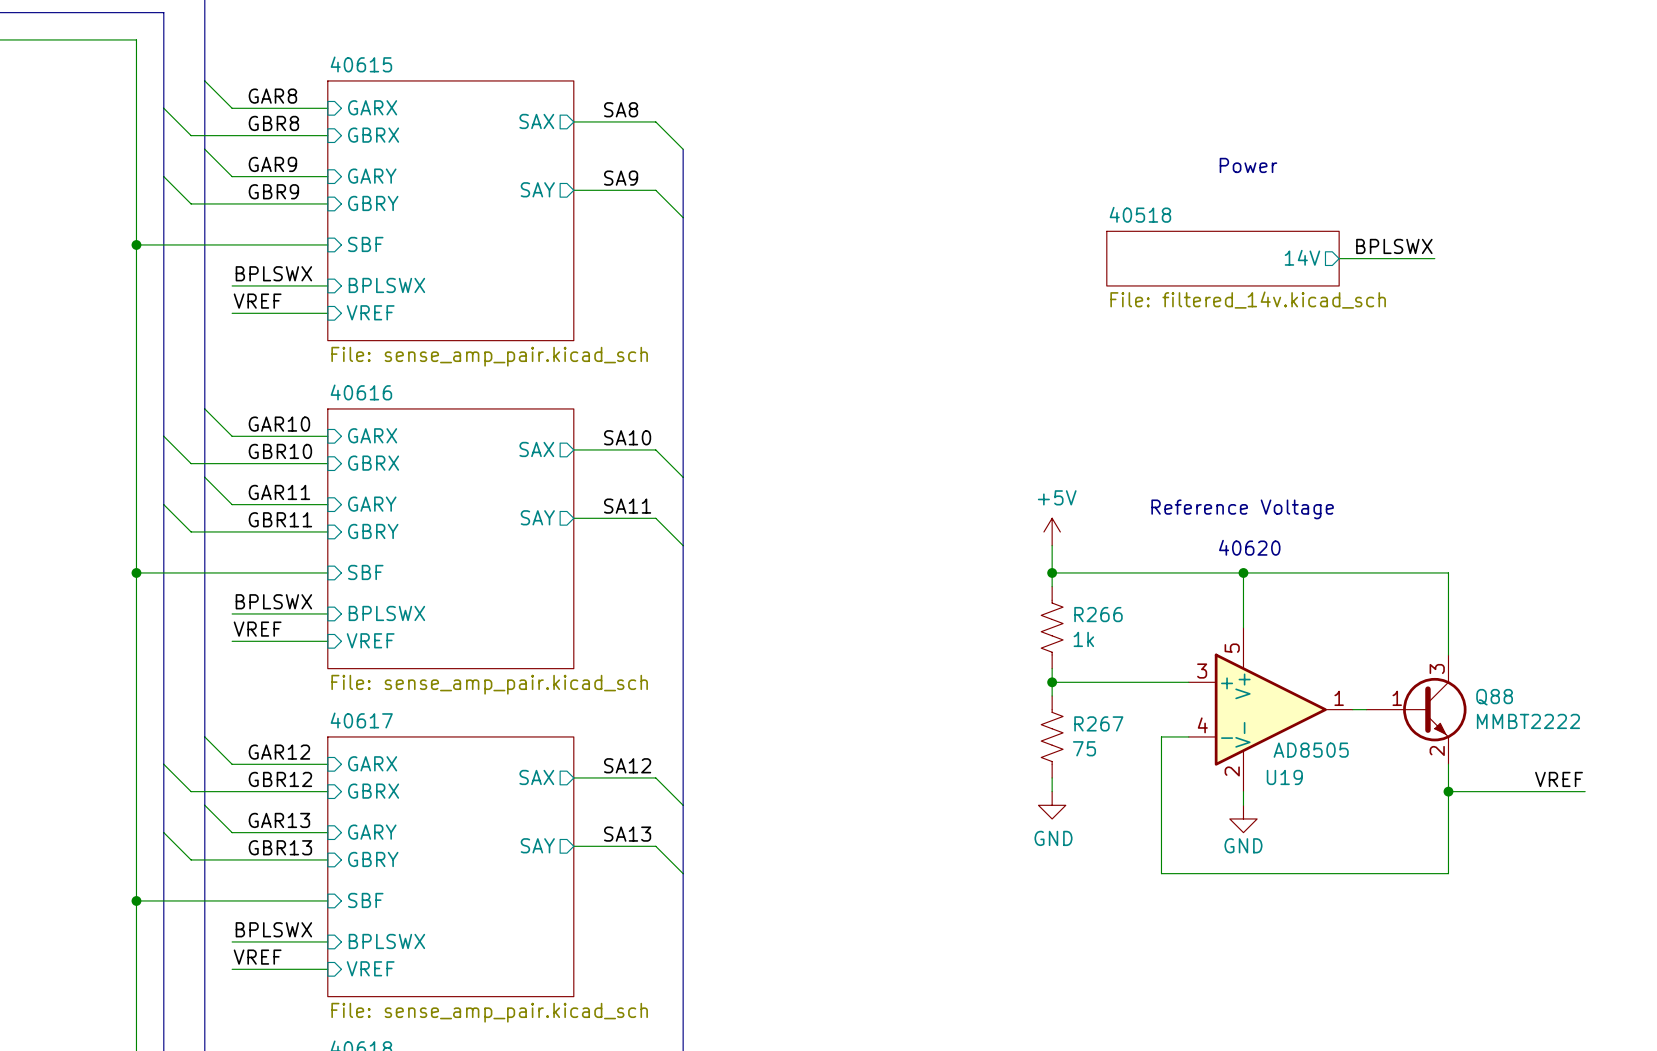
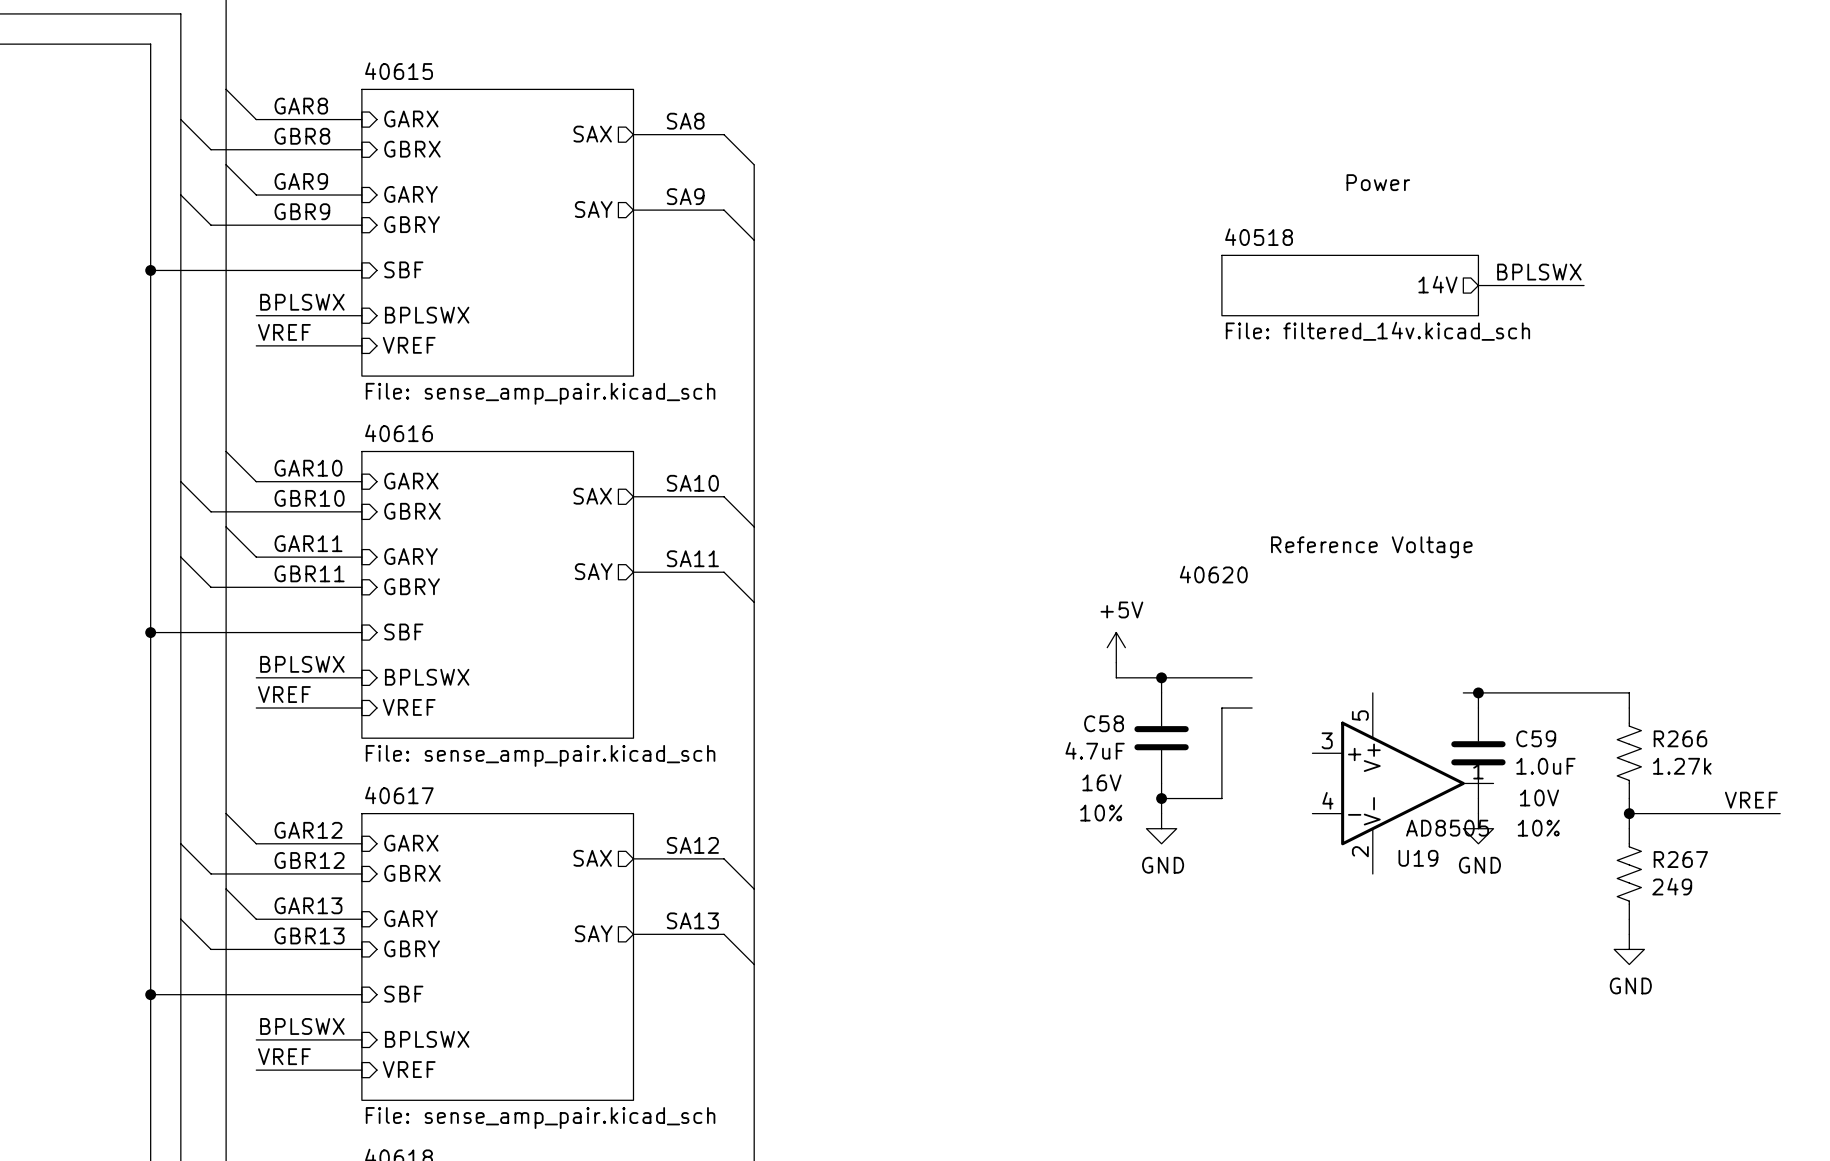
text position: Reference Voltage (1242, 509) -> Reference Voltage (1371, 547)
power symbol position: +5V (1052, 531) -> +5V (1116, 647)
wire: (1052, 545) (1052, 586) -> none
text position: 40620 (1249, 547) -> 40620 (1213, 574)
wire: (1052, 572) (1448, 572) (1448, 654) -> none
junction: (1052, 572) -> none
wire: (1243, 572) (1243, 627) -> none
junction: (1243, 572) -> none
wire: none -> (1116, 662) (1116, 677) (1252, 677)
junction: none -> (1161, 677)
R266 position: (1052, 627) -> (1629, 753)
wire: none -> (1463, 692) (1629, 692) (1629, 708)
wire: none -> (1478, 692) (1478, 708)
junction: none -> (1478, 692)
R266 value: 1k (1083, 639) -> 1.27k (1682, 766)
wire: none -> (1252, 708) (1221, 708) (1221, 798) (1161, 798)
C58: none -> 4.7uF (1161, 738)
wire: (1052, 682) (1188, 682) -> none
junction: (1052, 682) -> none
C59: none -> 1.0uF (1478, 753)
wire: (1352, 709) (1366, 709) -> none
Q88: MMBT2222 (1416, 709) -> none
junction: none -> (1161, 798)
wire: none -> (1629, 798) (1629, 828)
R267 position: (1052, 736) -> (1629, 873)
wire: (1188, 736) (1161, 736) (1161, 873) (1448, 873) (1448, 764) -> none
R267 value: 75 (1084, 748) -> 249 (1672, 886)
power symbol: none -> GND (1478, 828)
wire: (1052, 777) (1052, 791) -> (1161, 677) (1161, 692)
label position: VREF (1559, 779) -> VREF (1751, 800)
wire: (1243, 791) (1243, 805) -> (1478, 798) (1478, 813)
wire: (1448, 791) (1585, 791) -> (1629, 813) (1780, 813)
junction position: (1448, 791) -> (1629, 813)
power symbol position: GND (1052, 805) -> GND (1161, 828)
power symbol: GND (1243, 818) -> none
wire: none -> (1629, 919) (1629, 934)
power symbol: none -> GND (1629, 949)

